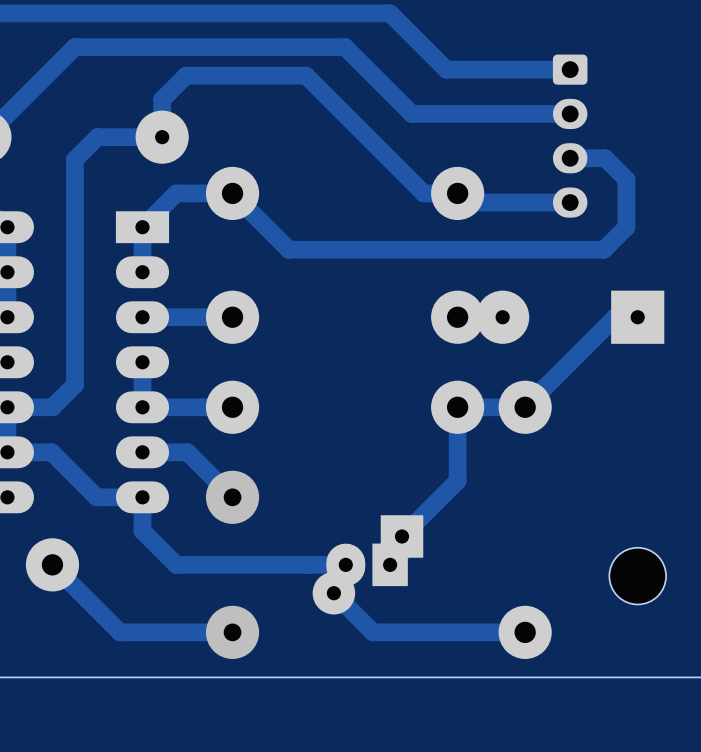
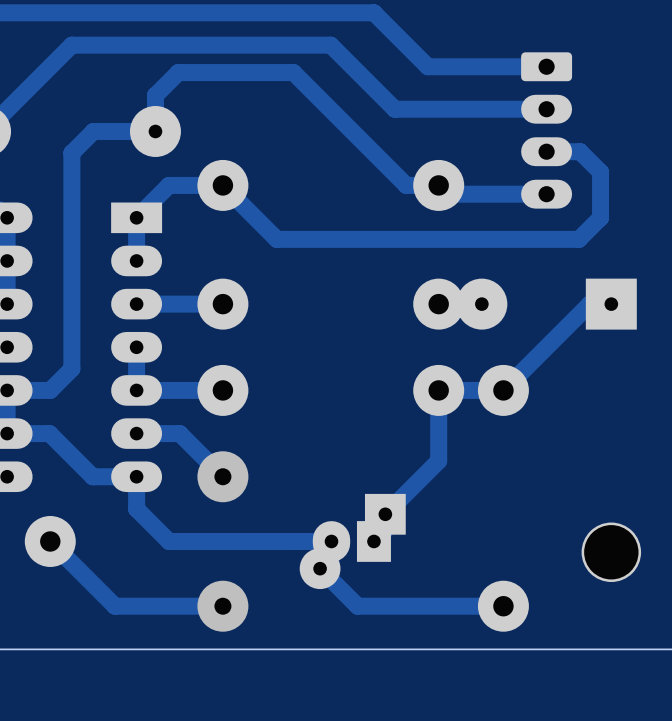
part footprint: [552, 54, 588, 218] -> [521, 52, 573, 209]
part footprint: [609, 547, 667, 605] -> [581, 522, 642, 583]

